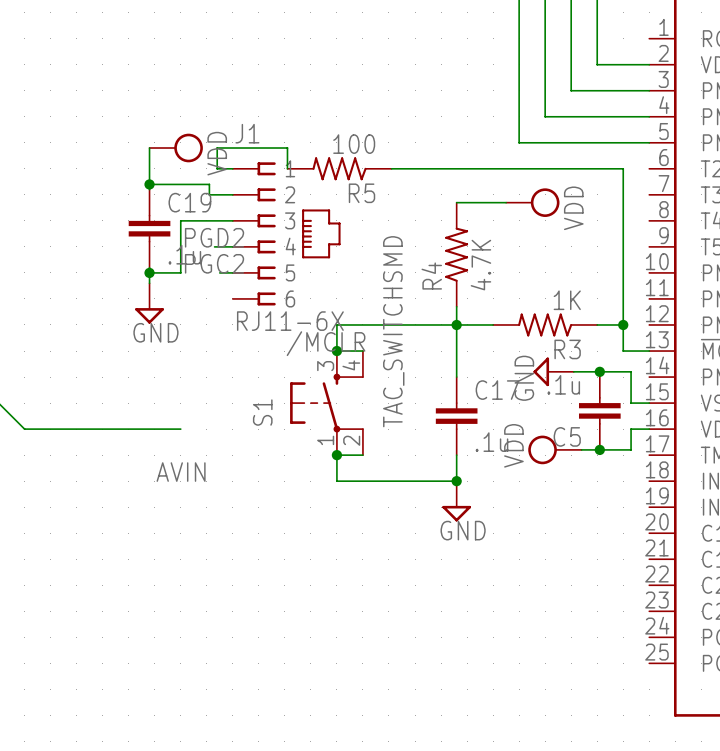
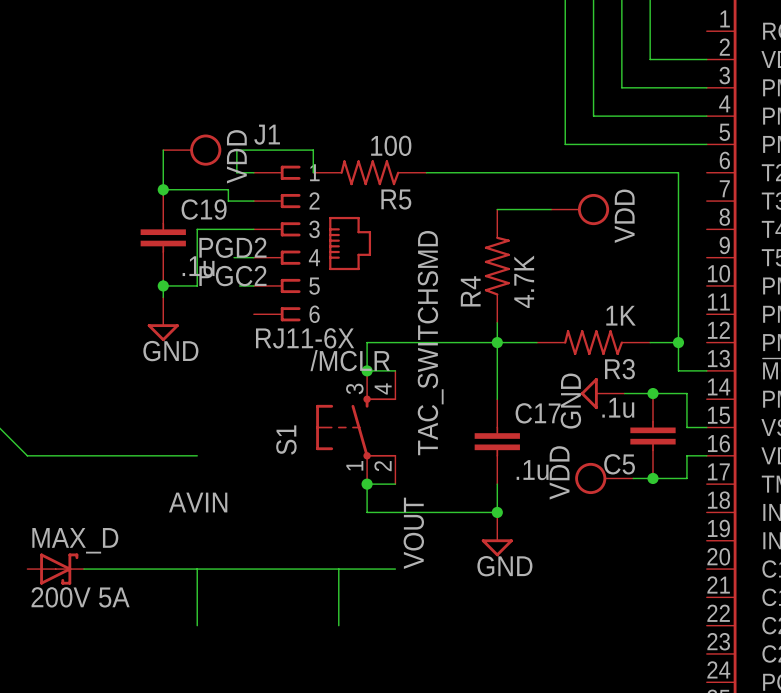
label: none -> VOUT (413, 533)
MAX_D: none -> 200V 5A (55, 569)
wire: none -> (84, 569) (395, 569)
wire: none -> (197, 569) (197, 625)
wire: none -> (338, 569) (338, 625)

